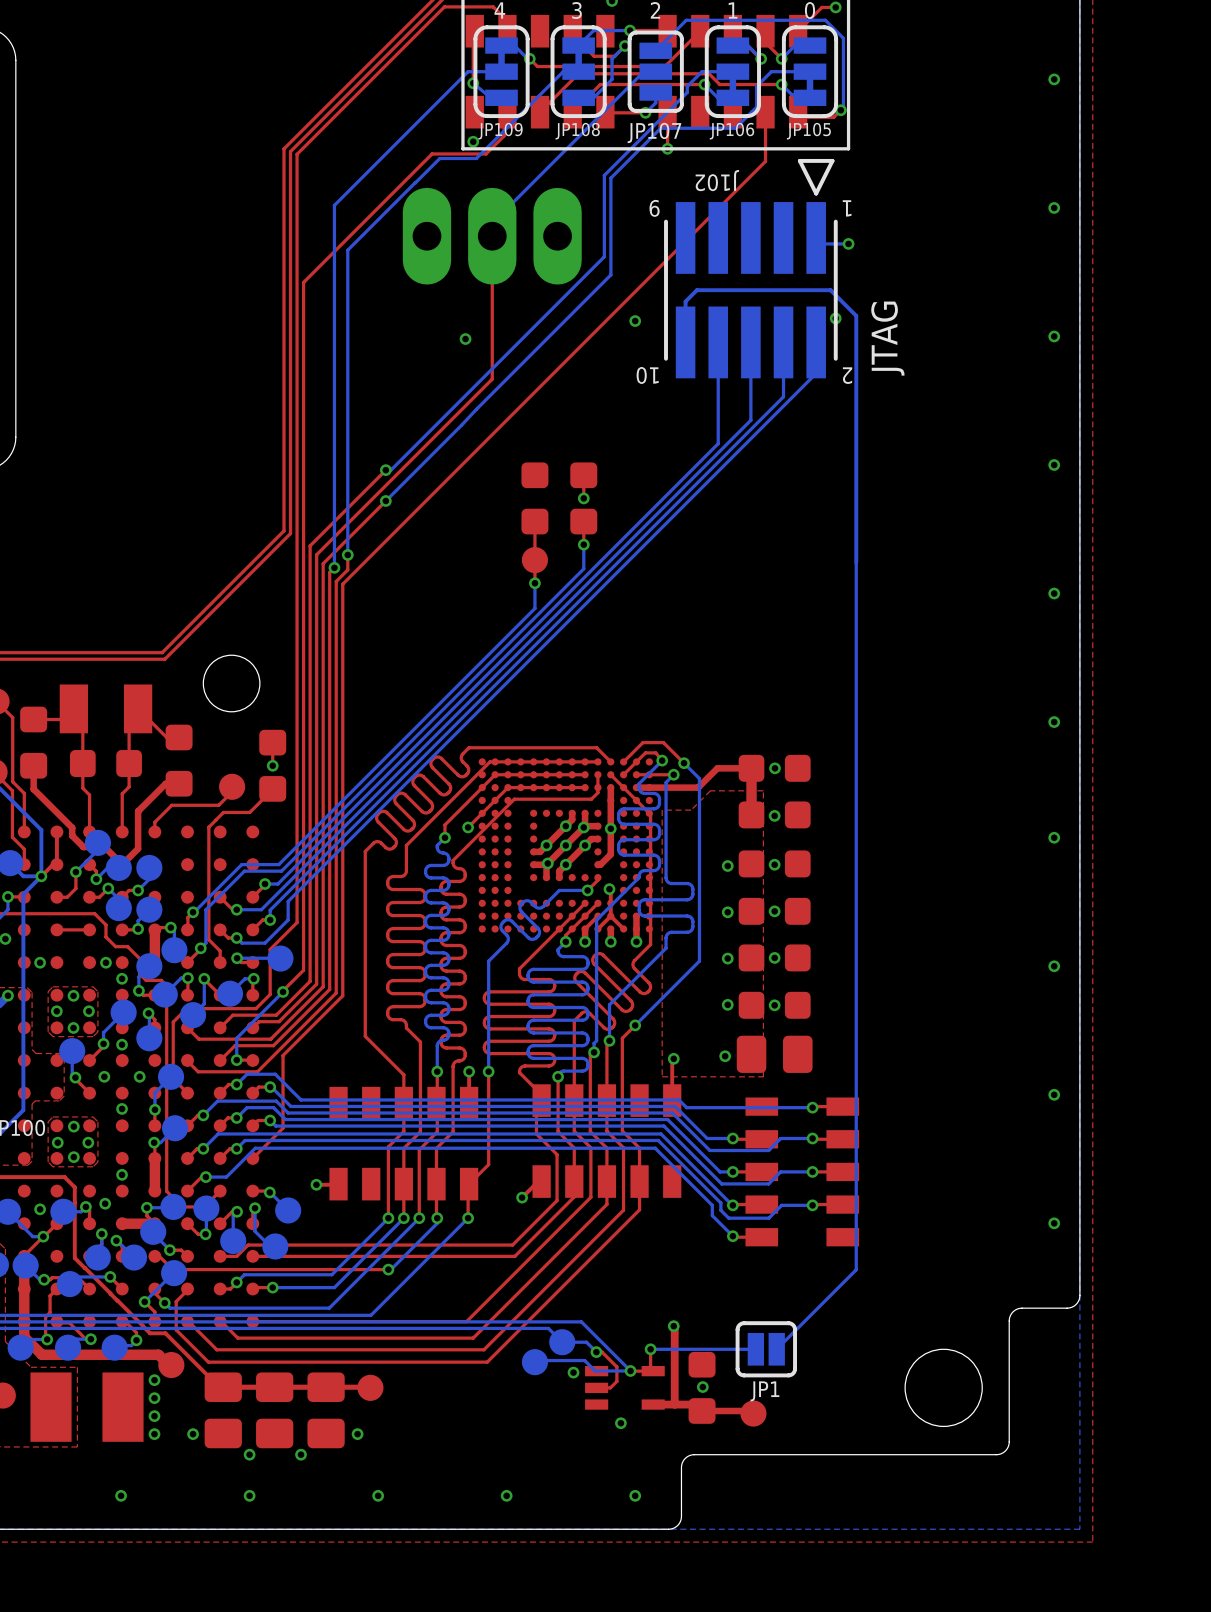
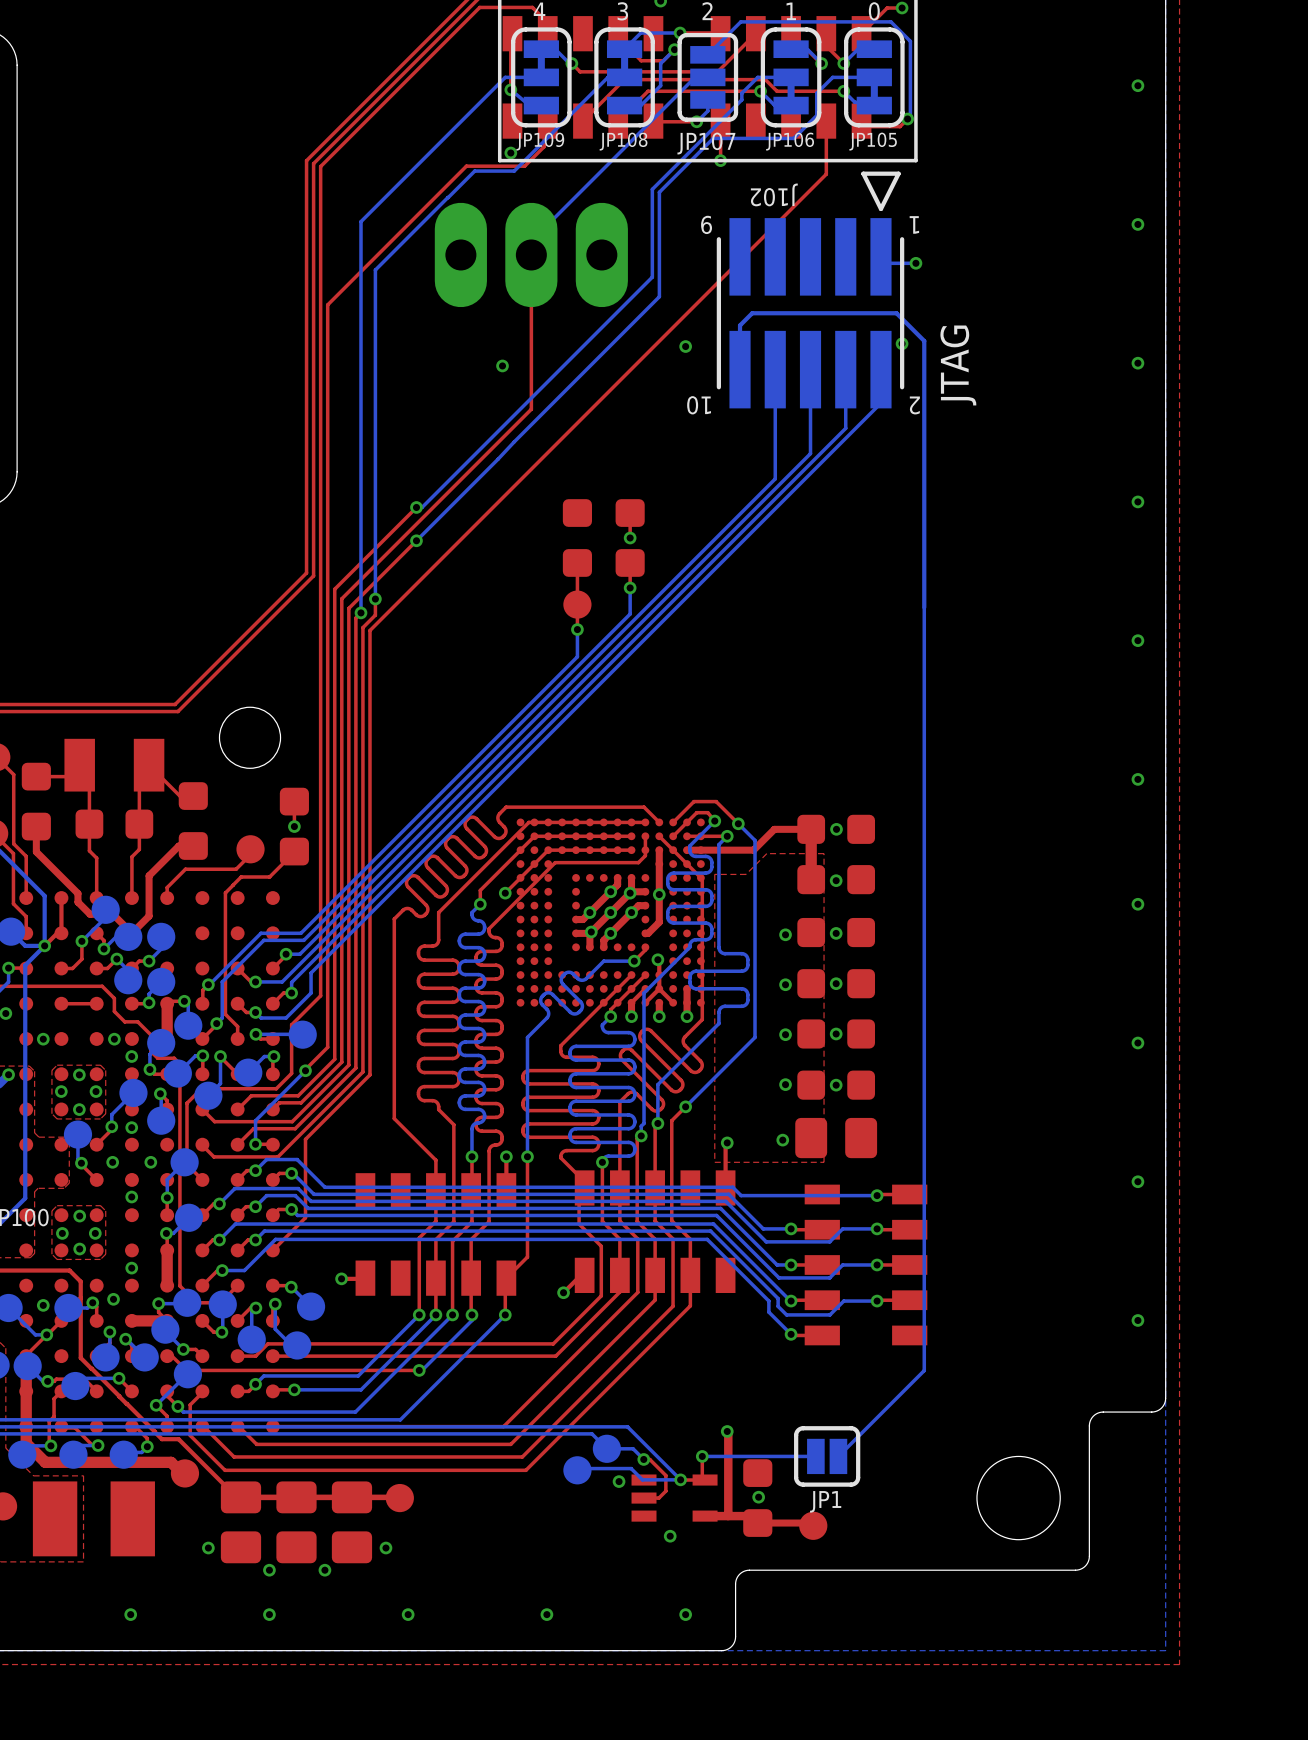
via: (154, 1380) -> none
via: (154, 1398) -> none
via: (154, 1416) -> none
via: (154, 1434) -> none

